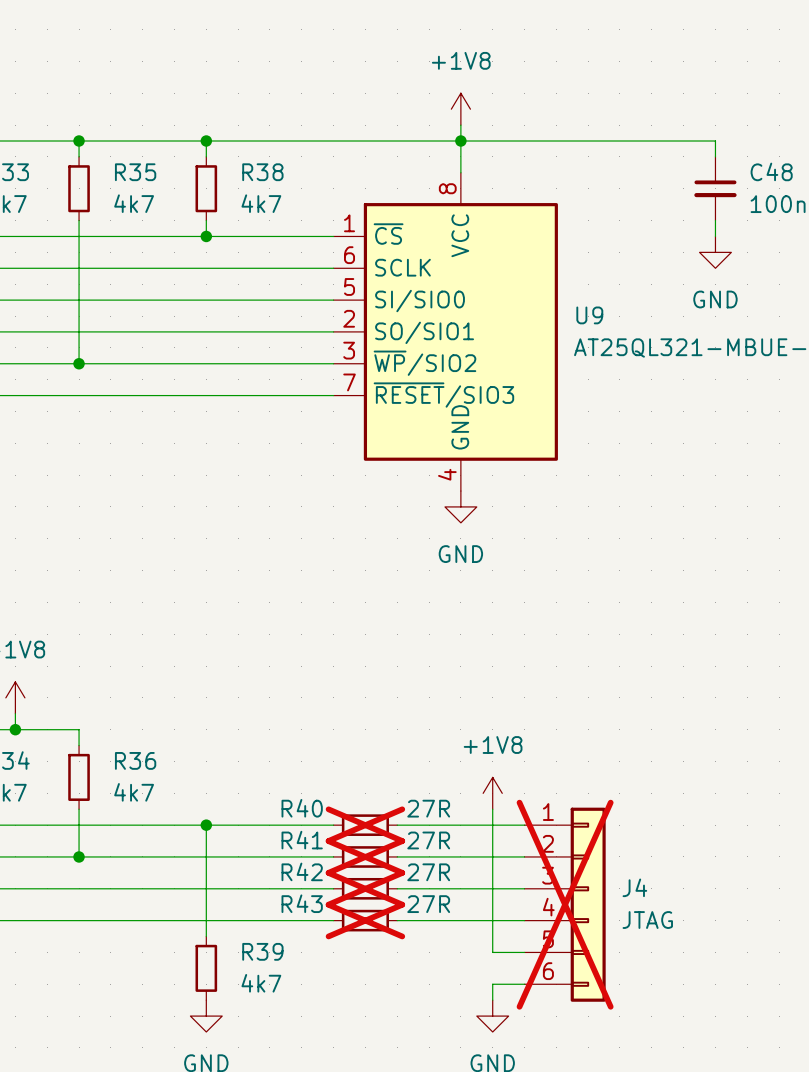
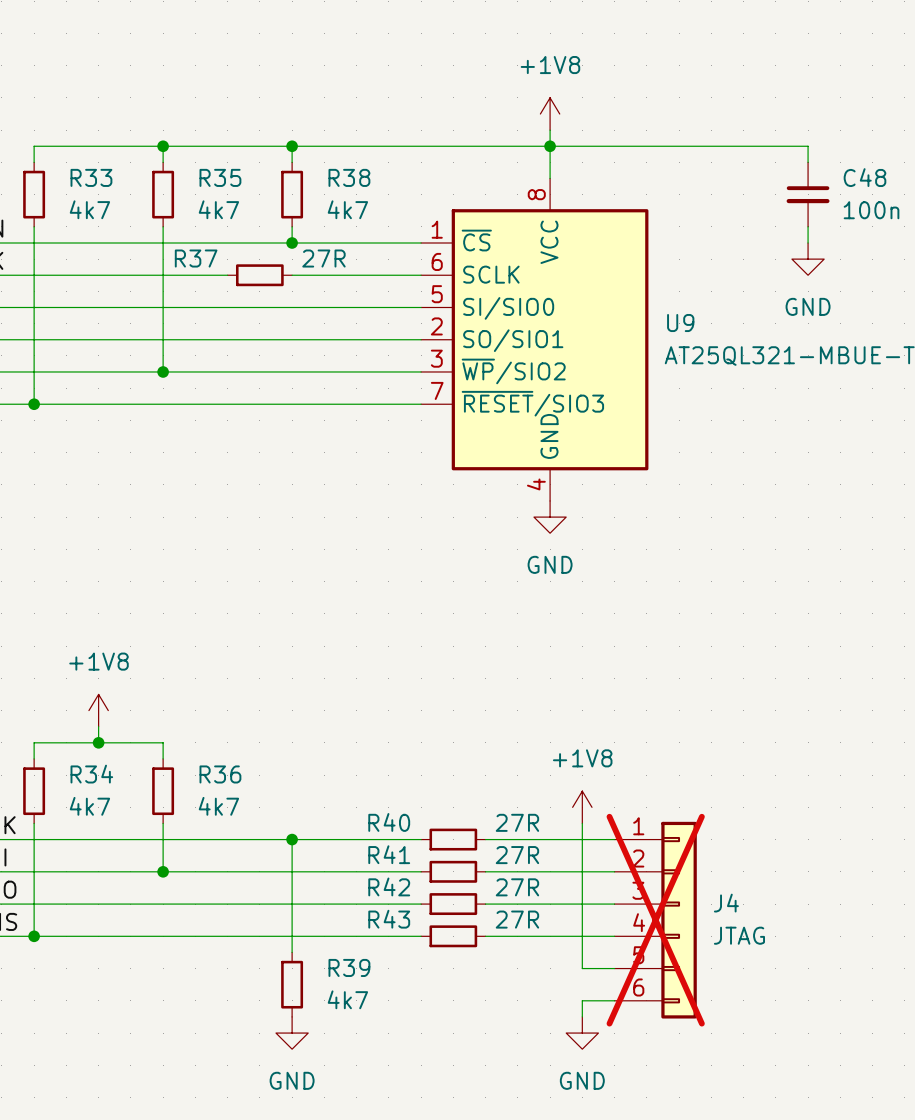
wire: (142, 268) (206, 268) -> none
R37: none -> 27R (259, 275)
R40 do-not-place cross: (365, 825) -> none
R41 do-not-place cross: (365, 856) -> none
R42 do-not-place cross: (365, 888) -> none
R43 do-not-place cross: (365, 920) -> none

